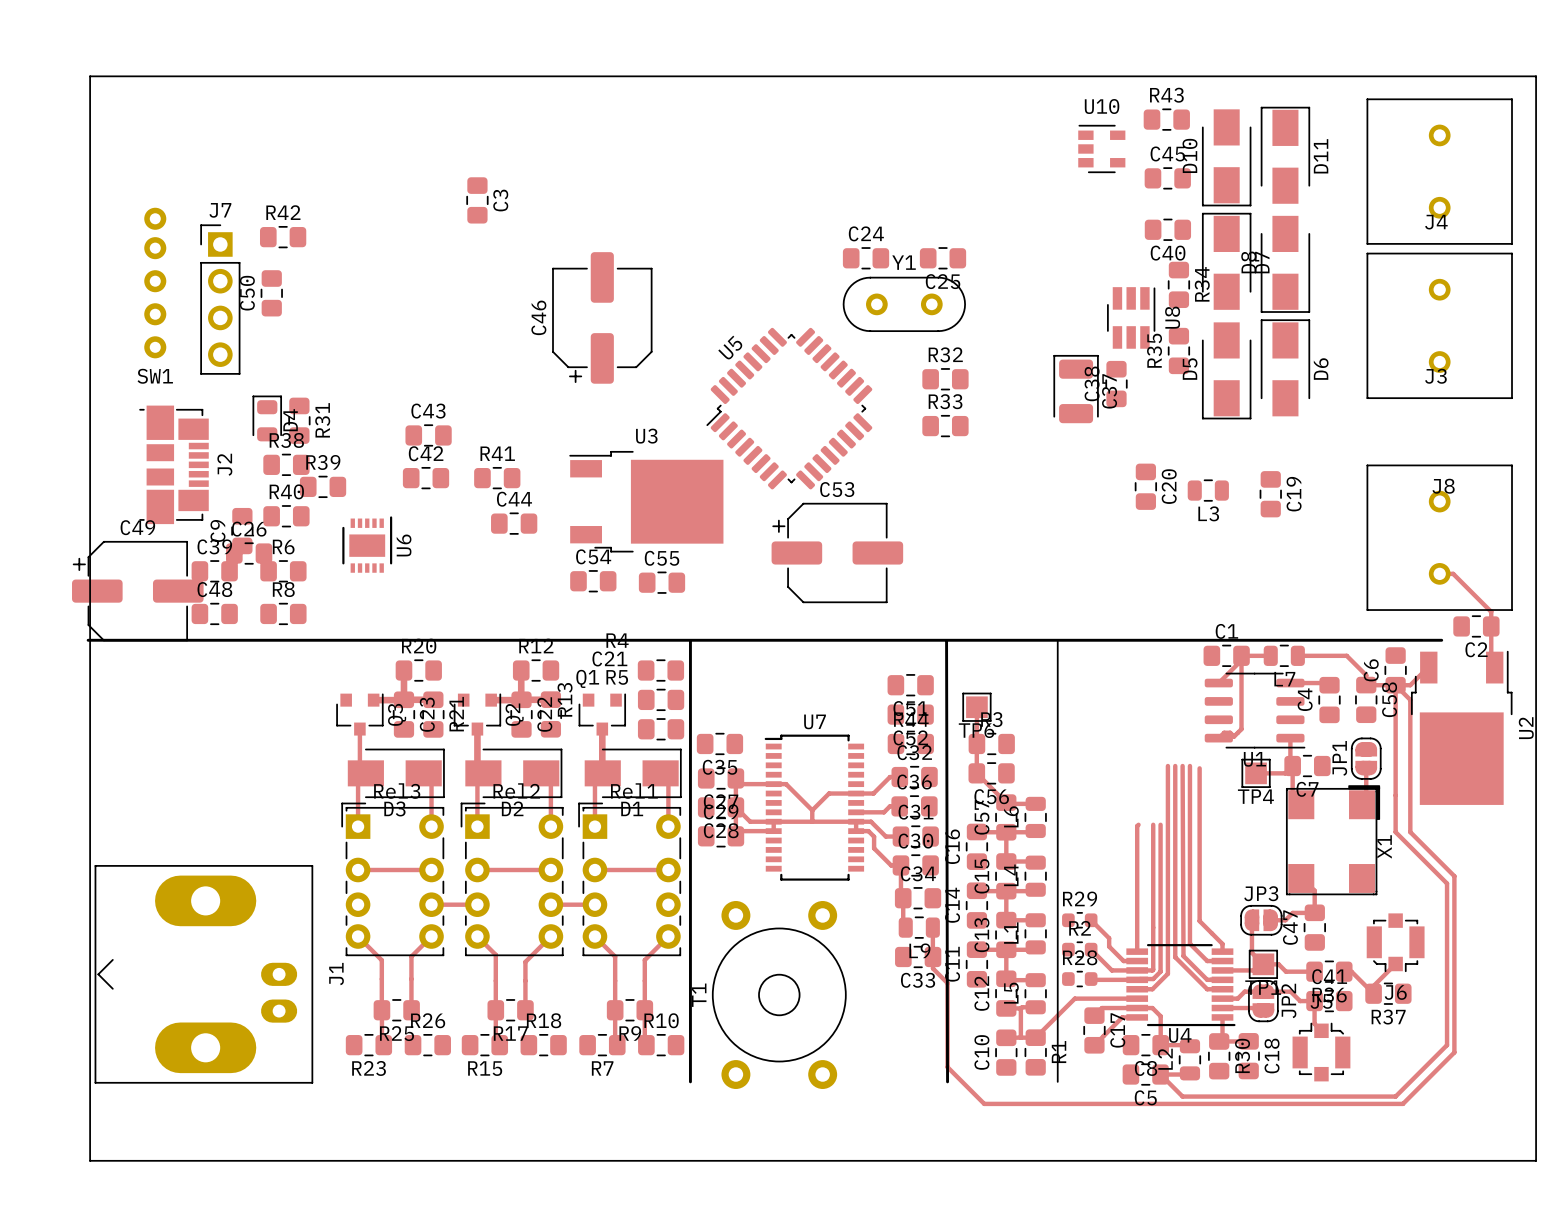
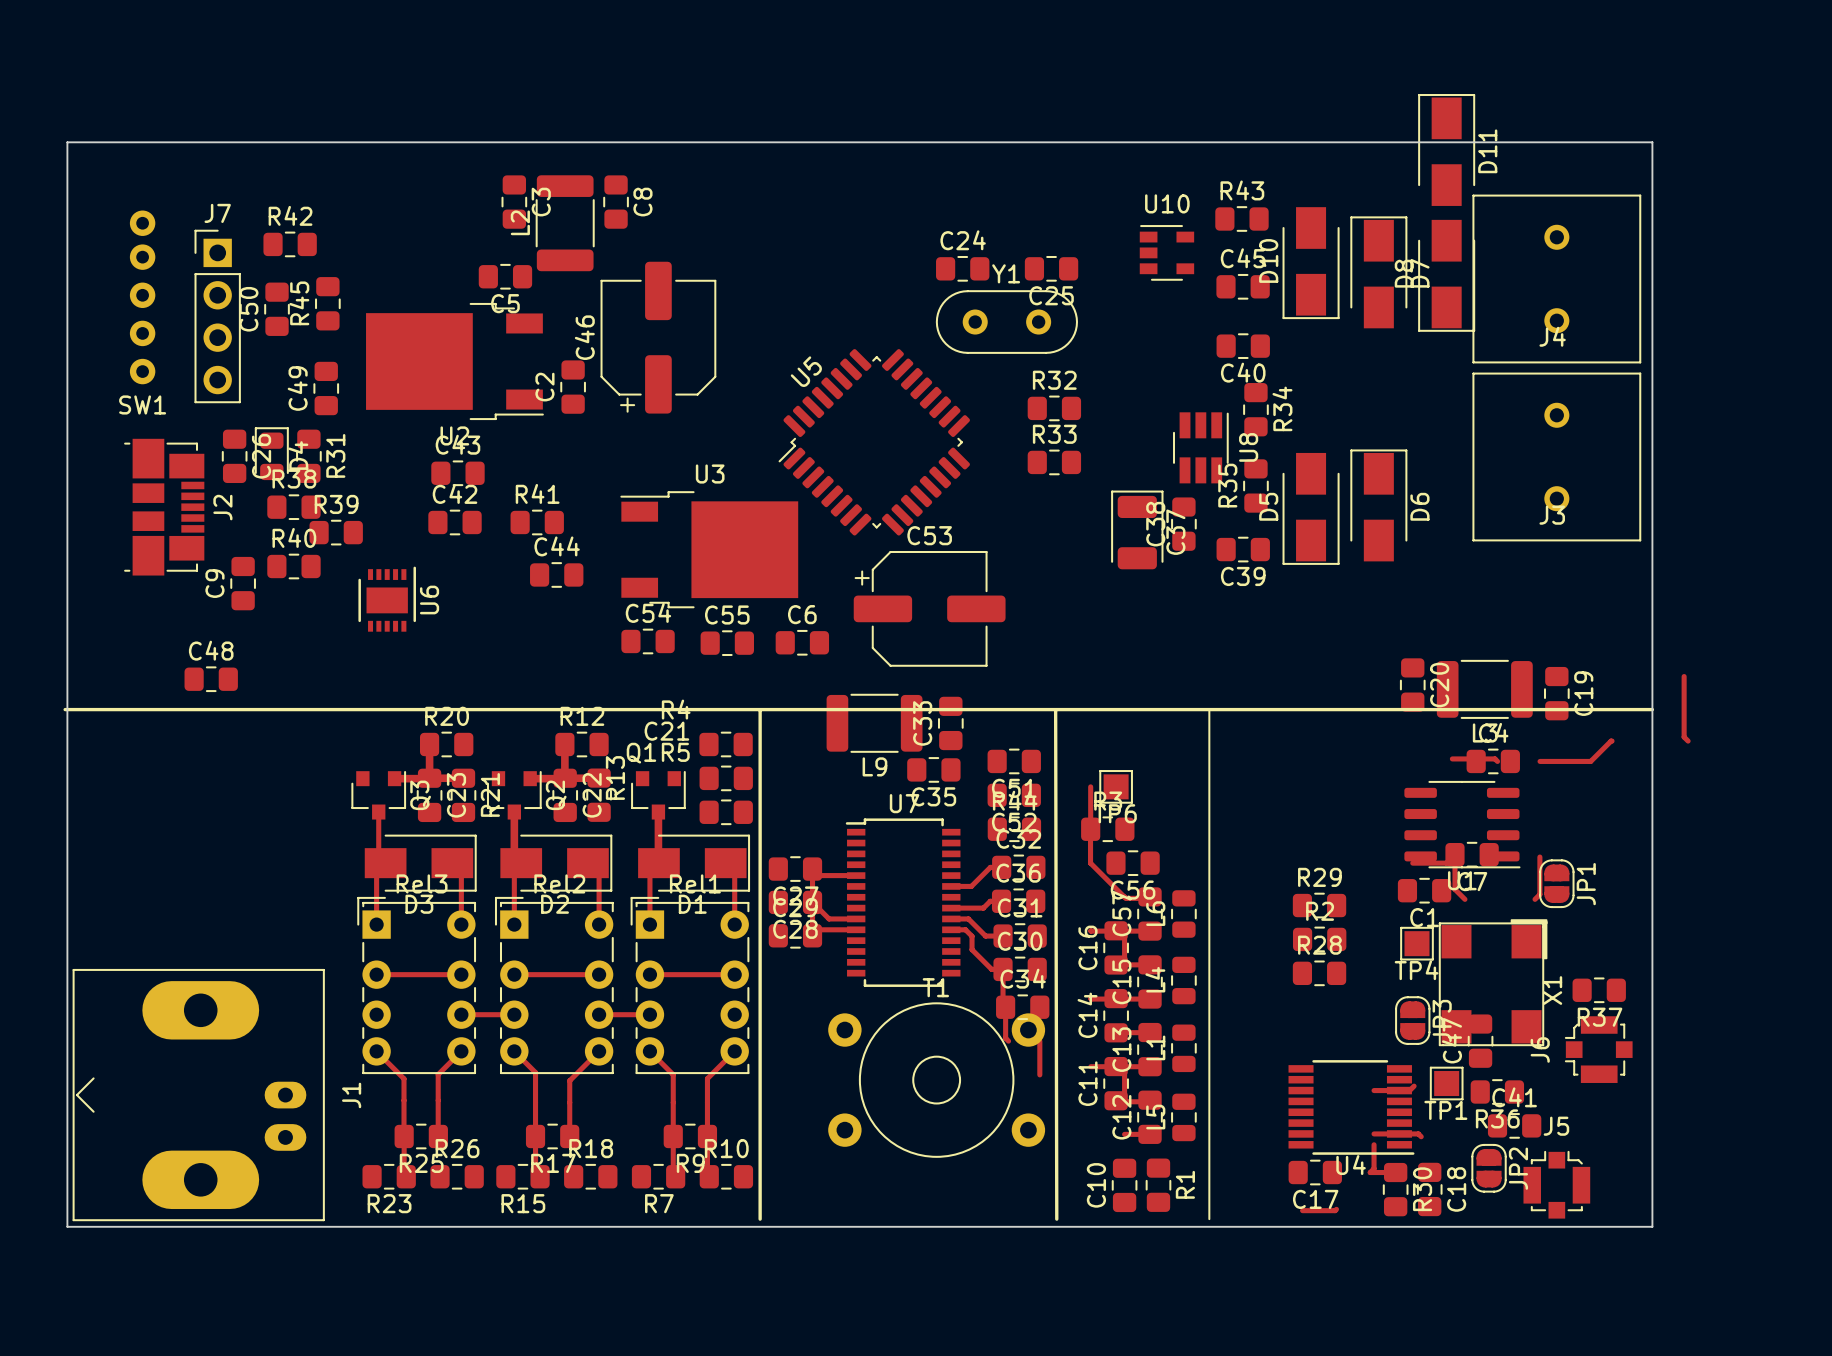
R43 position: (1166, 119) -> (1241, 219)
board edge: (90, 148) (90, 76) (1536, 76) (1536, 1160) (90, 1160) (90, 1088) -> (67, 142) (1652, 142) (1652, 1226) (67, 1226)
U10 position: (1101, 148) -> (1166, 252)
D10 position: (1226, 157) -> (1311, 263)
J4 position: (1439, 171) -> (1556, 279)
C45 position: (1167, 178) -> (1243, 286)
C40 position: (1167, 229) -> (1243, 346)
R34 position: (1178, 284) -> (1255, 409)
R45: none -> (327, 303)
U8 position: (1131, 317) -> (1200, 447)
J3 position: (1439, 325) -> (1556, 456)
R35 position: (1178, 350) -> (1255, 485)
D6 position: (1285, 367) -> (1378, 505)
D5 position: (1226, 370) -> (1311, 508)
C38 position: (1116, 384) -> (1183, 524)
C37 position: (1076, 389) -> (1137, 529)
L3 footprint: [1187, 479, 1229, 502] -> [1436, 659, 1533, 719]
C20 position: (1145, 486) -> (1412, 685)
C19 position: (1270, 494) -> (1556, 693)
C49 name position: C49 (137, 527) -> C49 (297, 388)
J8: (1439, 537) -> none
C49 footprint: [72, 540, 204, 642] -> [313, 361, 340, 416]
C39 name position: C39 (214, 546) -> C39 (1243, 576)
C26 rotation: 0° (249, 553) -> 90° clockwise (234, 456)
C26 position: (249, 553) -> (234, 456)
C39 position: (214, 571) -> (1243, 549)
R6: (283, 571) -> none
top track: (1439, 573) (1453, 573) (1490, 611) -> none
R8: (283, 613) -> none
C2 rotation: 0° (1476, 626) -> 90° clockwise (573, 387)
C2 position: (1476, 626) -> (573, 387)
C1 name position: C1 (1226, 631) -> C1 (1424, 917)
line: none -> (1626, 709) (1652, 709)
line: (1057, 641) (1057, 1081) -> (1209, 710) (1209, 1219)
C1 position: (1226, 655) -> (1424, 890)
top track: (1270, 655) (1241, 655) (1241, 729) (1234, 736) (1230, 732) (1224, 732) (1218, 738) -> none
L7: (1284, 655) -> none
top track: (1297, 655) (1346, 655) (1366, 675) (1366, 685) -> none
top track: (1241, 660) (1218, 683) -> none
C6 rotation: 0° (1395, 670) -> 90° clockwise (802, 642)
C6 position: (1395, 670) -> (802, 642)
C58: (1366, 699) -> none
C4 rotation: 0° (1329, 700) -> 90° clockwise (1493, 761)
TP6 position: (976, 707) -> (1116, 786)
U1 position: (1255, 710) -> (1462, 824)
U2 rotation: 0° (1461, 727) -> 90° clockwise (454, 361)
U2 position: (1461, 727) -> (454, 361)
top track: (1290, 738) (1290, 763) (1292, 766) -> none
C35 position: (719, 743) -> (933, 769)
JP1 name position: JP1 (1339, 758) -> JP1 (1586, 884)
JP1 position: (1366, 758) -> (1556, 883)
top track: (1167, 766) (1167, 973) (1152, 989) (1137, 989) -> none
top track: (1175, 766) (1175, 957) (1207, 989) (1222, 989) -> none
top track: (1182, 766) (1183, 956) (1207, 979) (1222, 979) -> none
top track: (1189, 766) (1189, 943) (1207, 961) (1222, 961) -> none
top track: (1199, 768) (1199, 921) (1222, 943) (1222, 951) -> none
C56 position: (991, 773) -> (1133, 863)
TP4 position: (1256, 773) -> (1416, 943)
top track: (773, 784) (786, 784) (812, 810) -> none
top track: (856, 793) (829, 793) (812, 810) -> none
top track: (812, 810) (812, 821) -> none
C57 position: (1006, 817) -> (1150, 914)
L6 position: (1035, 817) -> (1183, 914)
top track: (1138, 824) (1137, 951) -> none
top track: (1153, 824) (1153, 969) (1111, 970) (1091, 949) -> none
top track: (1160, 824) (1160, 971) (1153, 979) (1091, 979) -> none
top track: (773, 831) (773, 821) (856, 821) (856, 831) -> none
X1 position: (1333, 840) -> (1493, 982)
C16 position: (976, 846) -> (1116, 947)
C15 position: (1006, 876) -> (1150, 981)
L4 position: (1035, 876) -> (1183, 980)
top track: (1301, 878) (1314, 890) (1314, 912) (1292, 912) (1285, 920) (1270, 920) -> none
top track: (1006, 891) (1006, 920) -> none
C14 position: (976, 905) -> (1116, 1015)
R29 footprint: [1062, 912, 1098, 929] -> [1292, 892, 1347, 919]
L9 footprint: [898, 916, 940, 939] -> [826, 693, 923, 753]
top track: (1091, 920) (1109, 938) (1109, 946) (1123, 961) (1137, 961) -> none
top track: (1251, 920) (1251, 952) (1263, 964) (1278, 964) (1286, 971) (1314, 971) -> none
JP3 rotation: 0° (1261, 920) -> 90° clockwise (1412, 1020)
L1 position: (1035, 933) -> (1183, 1048)
C13 position: (1006, 934) -> (1150, 1049)
R2 footprint: [1062, 941, 1098, 958] -> [1292, 926, 1347, 953]
J6 rotation: 0° (1395, 942) -> 90° clockwise (1598, 1049)
C33 rotation: 0° (918, 957) -> 90° clockwise (950, 723)
C33 position: (918, 957) -> (950, 723)
top track: (932, 957) (932, 968) (947, 983) (947, 1067) (984, 1103) (1402, 1103) (1454, 1052) (1454, 876) (1410, 832) (1410, 699) (1395, 685) (1395, 832) (1447, 883) (1447, 1045) (1395, 1096) (1182, 1096) (1160, 1074) (1161, 1073) -> none
top track: (1395, 963) (1373, 986) (1373, 993) (1351, 971) (1344, 971) -> none
C11 position: (976, 964) -> (1116, 1083)
TP1 position: (1263, 964) -> (1446, 1083)
R28 footprint: [1062, 970, 1098, 988] -> [1292, 960, 1347, 987]
U4 position: (1180, 985) -> (1351, 1107)
C12 position: (1006, 993) -> (1150, 1117)
L5 position: (1035, 993) -> (1183, 1117)
R37 position: (1388, 993) -> (1599, 990)
T1 rotation: 0° (779, 995) -> 90° clockwise (936, 1080)
top track: (1137, 998) (1074, 998) (1035, 1037) (1006, 1037) -> none
top track: (1222, 998) (1237, 998) (1244, 991) (1290, 991) (1300, 1001) (1314, 1001) (1314, 1023) (1321, 1030) -> none
JP2 position: (1263, 1001) -> (1489, 1168)
C41 position: (1329, 1001) -> (1514, 1125)
top track: (1035, 1007) (1020, 1008) (1020, 1037) -> none
top track: (1094, 1015) (1102, 1008) (1152, 1008) (1160, 1016) (1160, 1045) (1189, 1046) -> none
top track: (1137, 1017) (1122, 1017) (1094, 1045) -> none
C17 rotation: 0° (1094, 1030) -> 90° clockwise (1315, 1172)
C17 position: (1094, 1030) -> (1315, 1172)
L2 footprint: [1178, 1039, 1202, 1081] -> [535, 175, 595, 272]
C8 rotation: 0° (1145, 1045) -> 90° clockwise (616, 202)
C8 position: (1145, 1045) -> (616, 202)
J5 position: (1321, 1052) -> (1556, 1184)
R30 position: (1219, 1056) -> (1395, 1189)
C18 position: (1248, 1056) -> (1429, 1189)
C8 name position: C8 (1146, 1068) -> C8 (642, 202)
C5 position: (1145, 1074) -> (505, 276)

